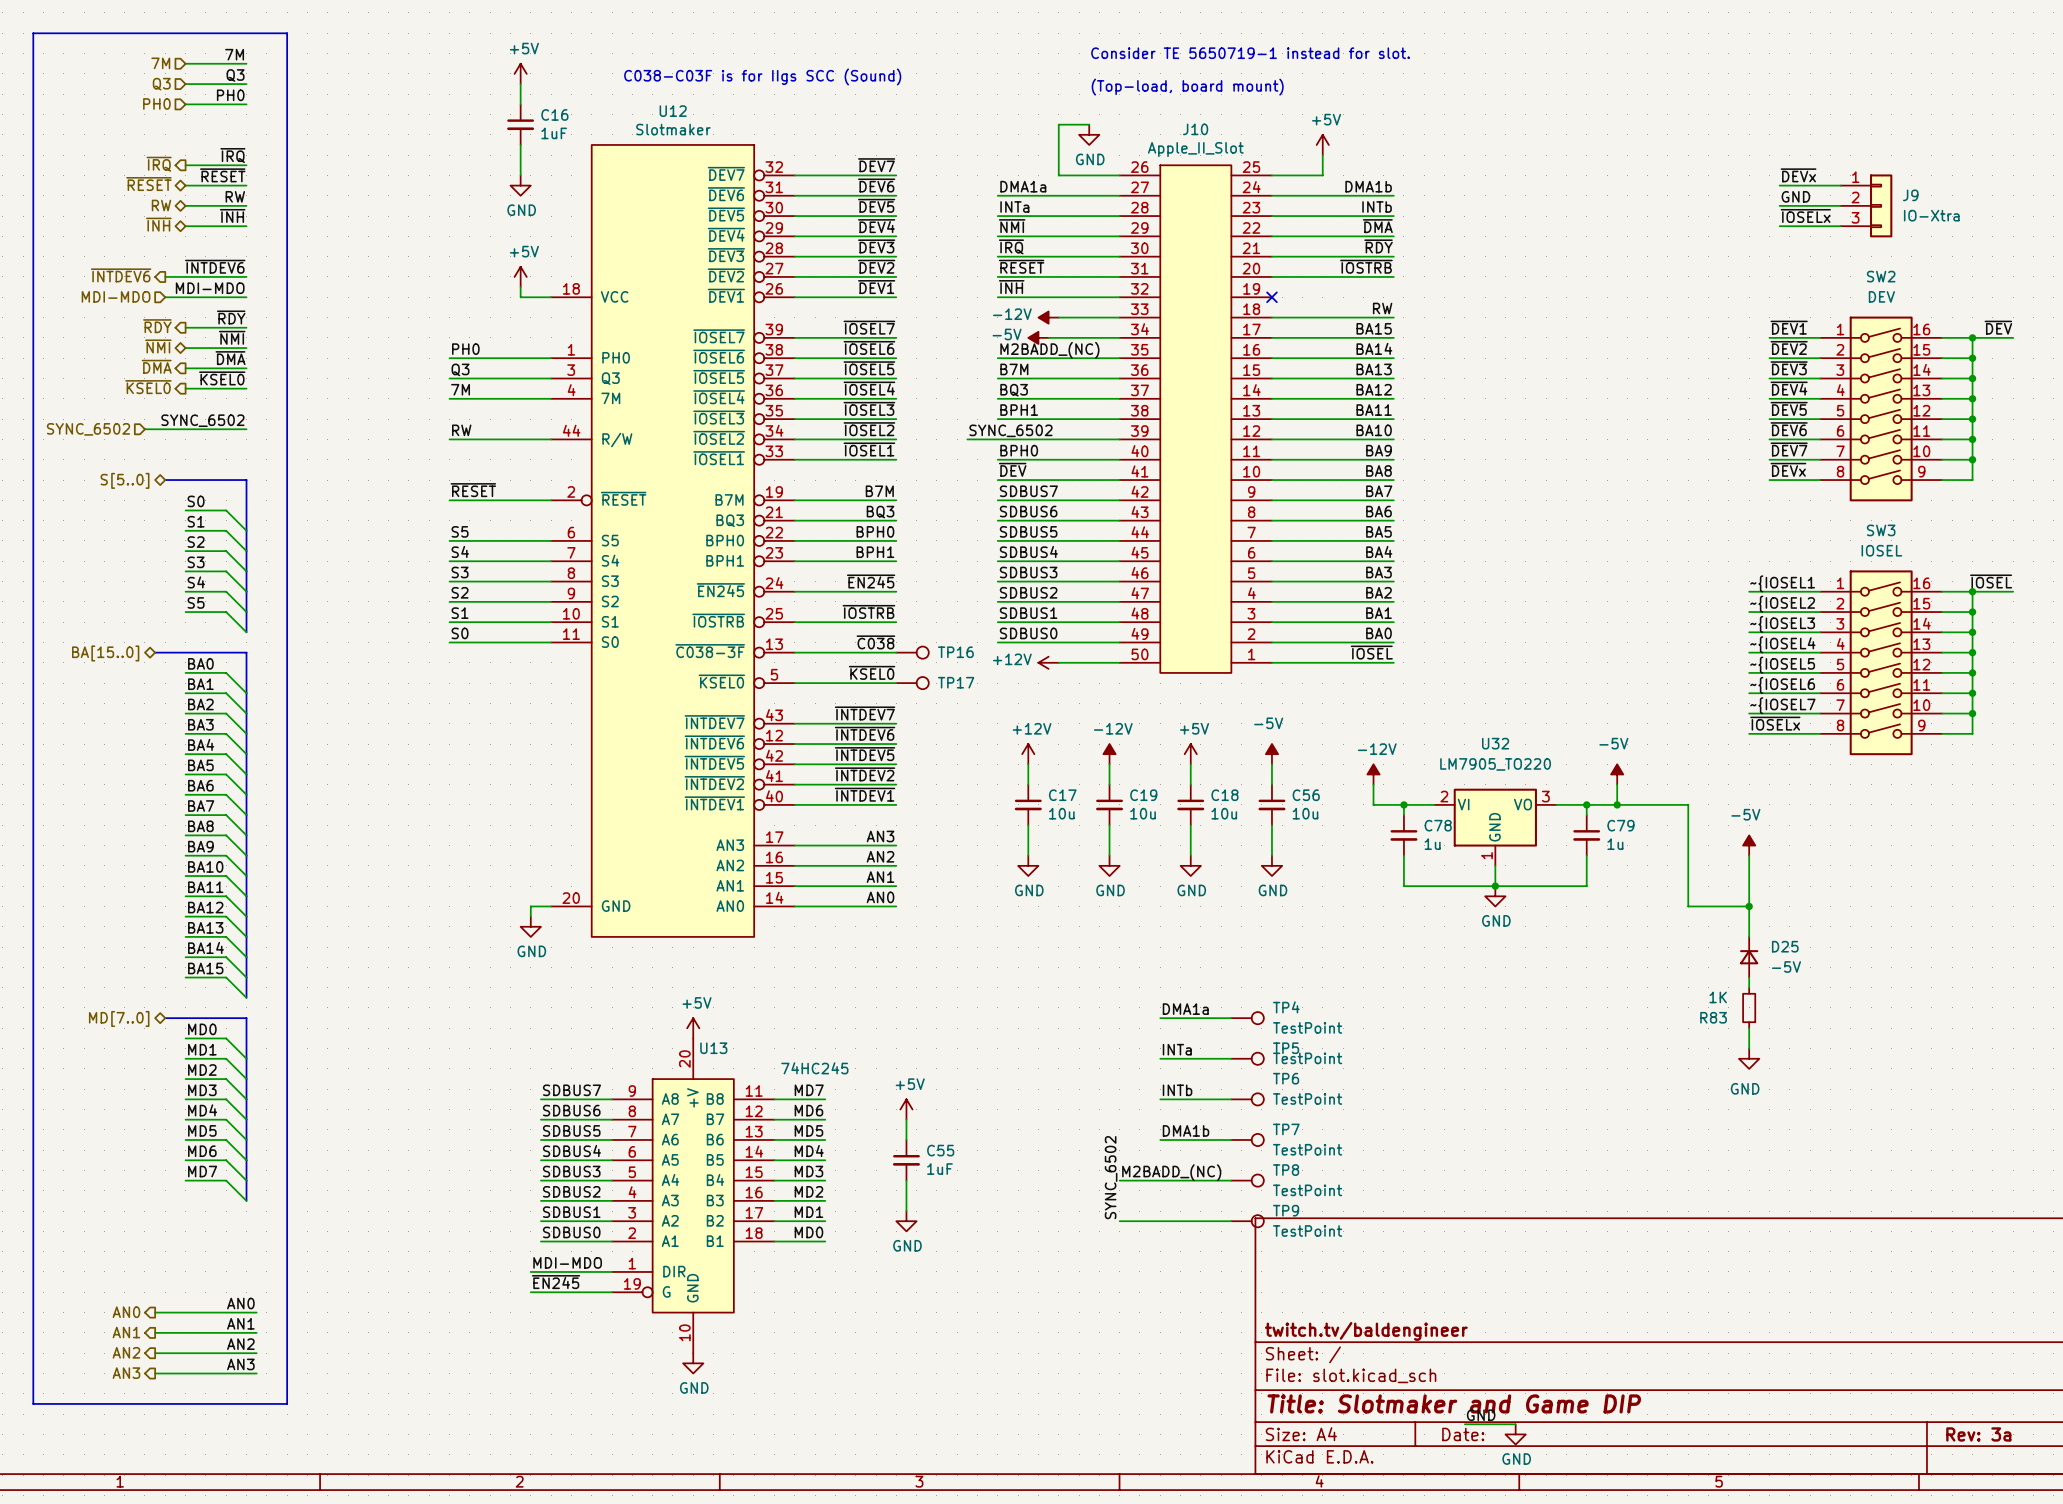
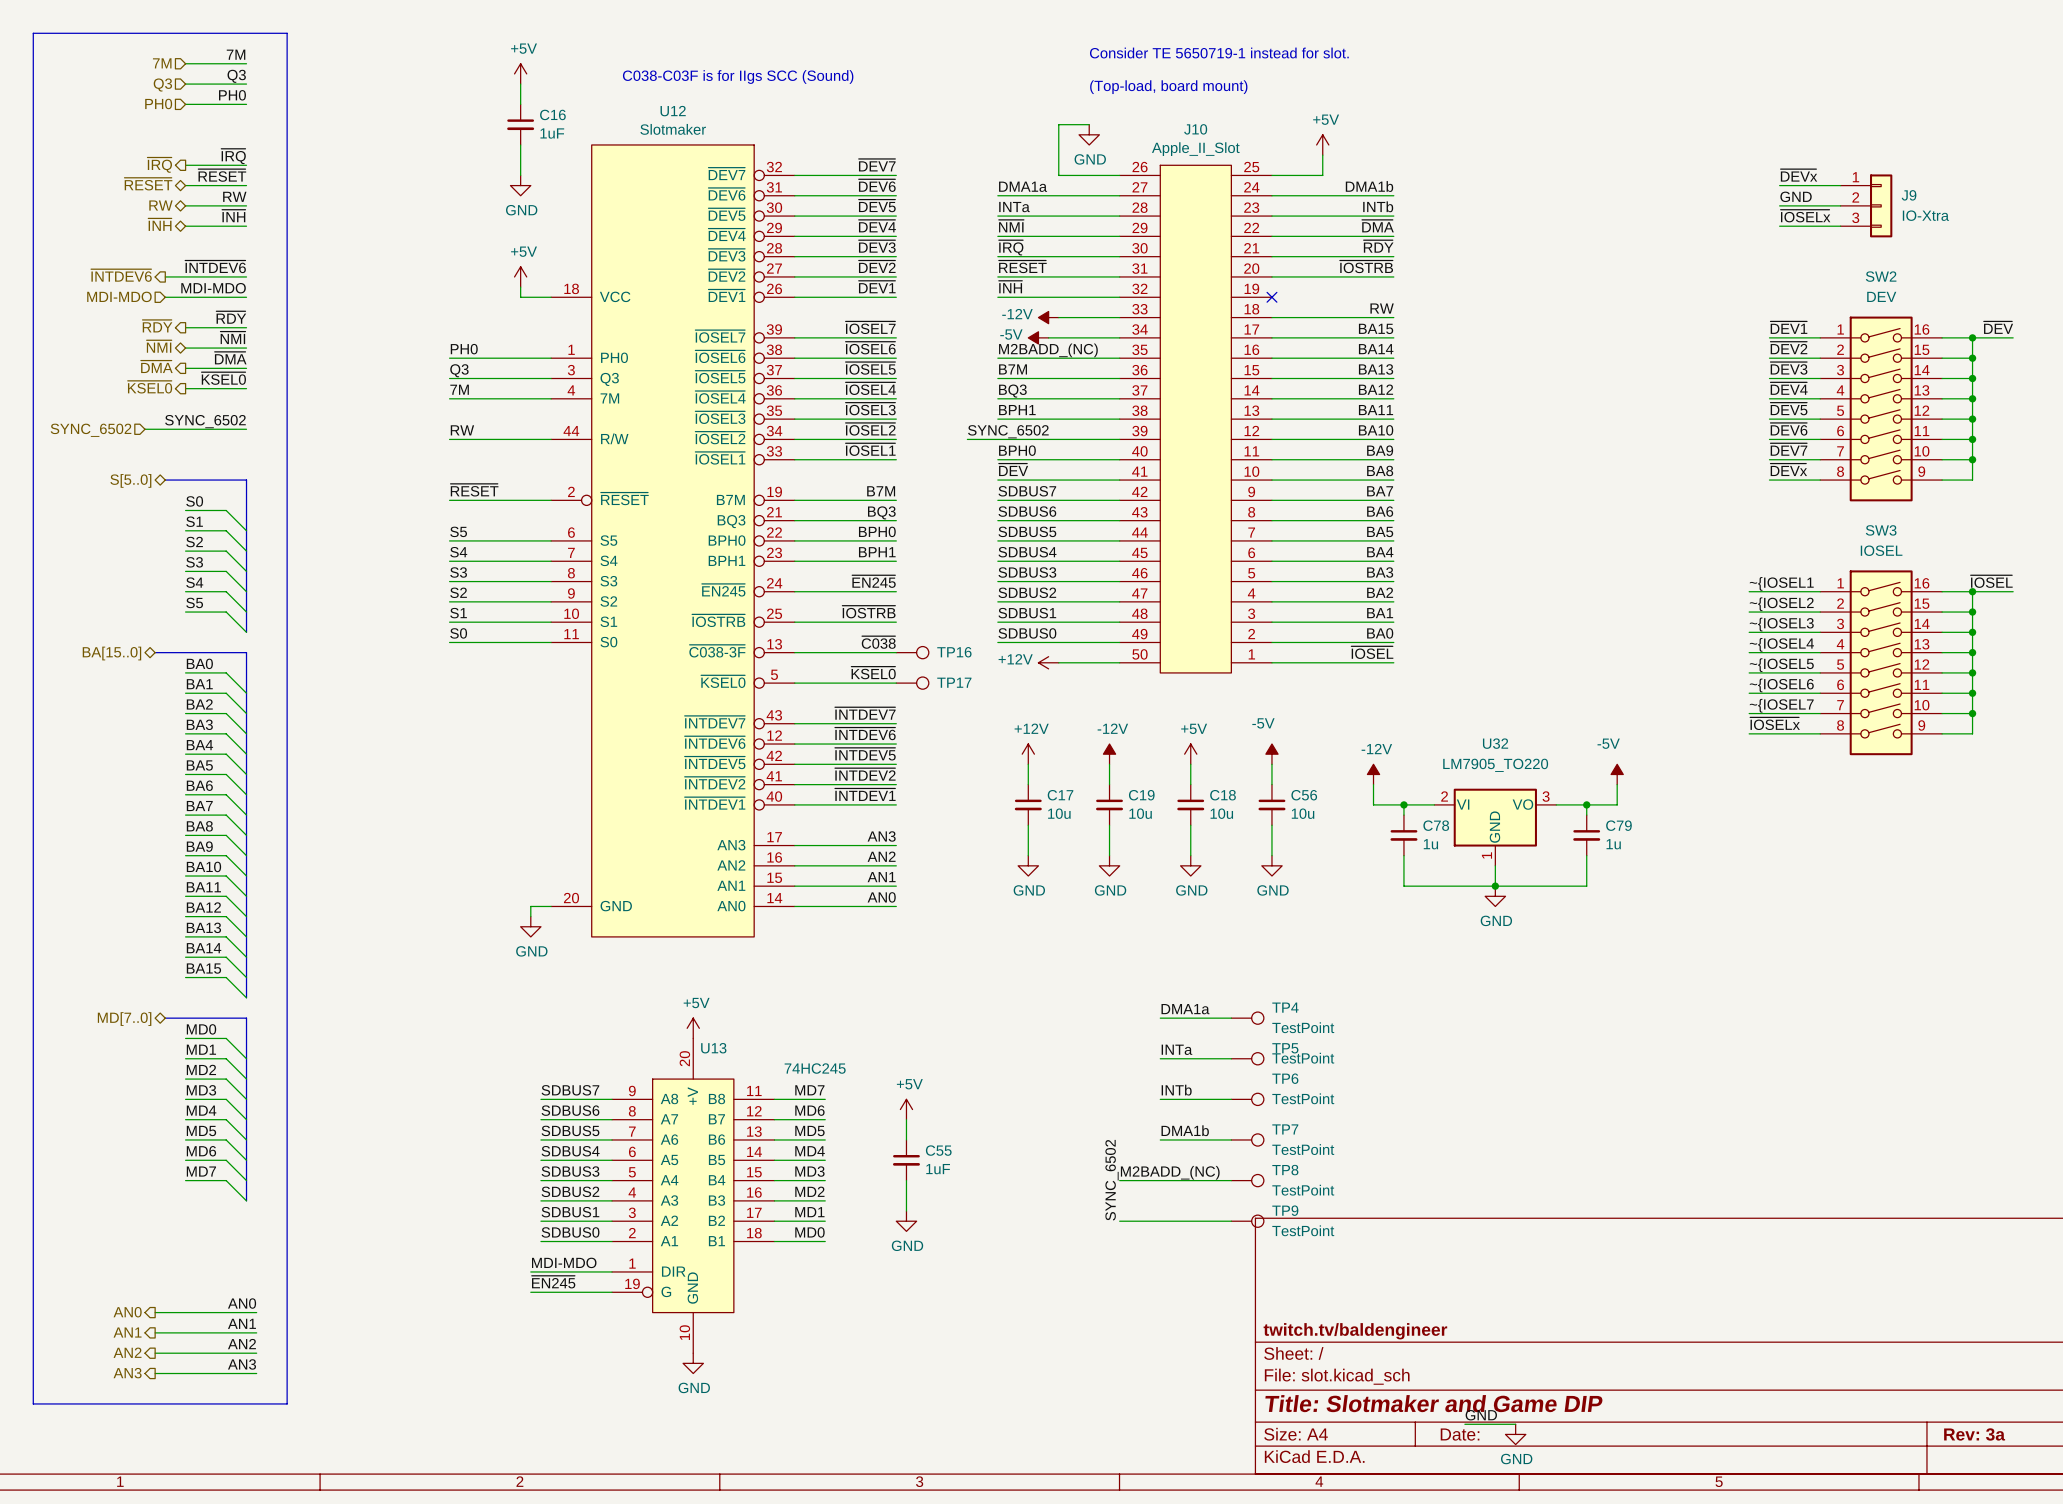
wire: (1617, 804) (1688, 804) (1688, 906) (1749, 906) -> none
junction: (1617, 804) -> none
power symbol: -5V (1749, 845) -> none
wire: (1749, 855) (1749, 936) -> none
junction: (1749, 906) -> none
D25: -5V (1749, 957) -> none
wire: (1749, 977) (1749, 987) -> none
R83: 1K (1749, 1007) -> none
wire: (1749, 1028) (1749, 1048) -> none
power symbol: GND (1749, 1058) -> none

